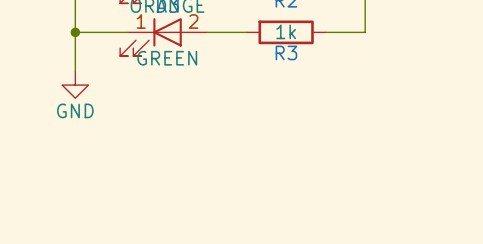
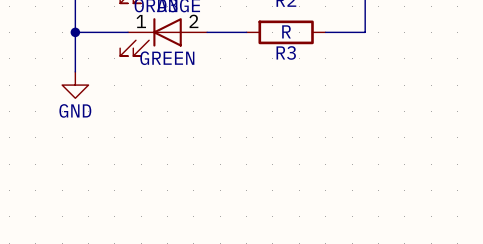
R3 value: 1k (286, 31) -> R (286, 31)

